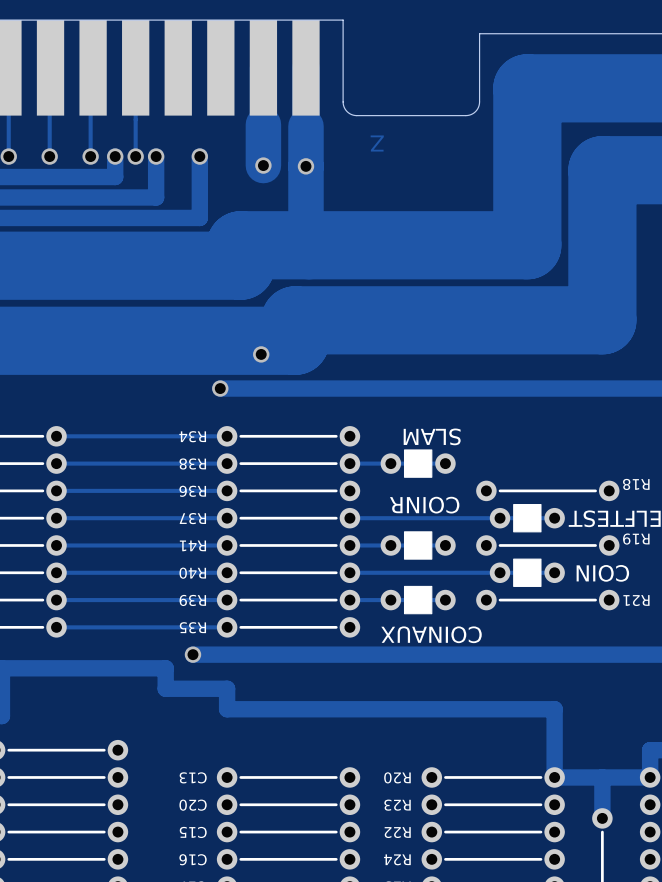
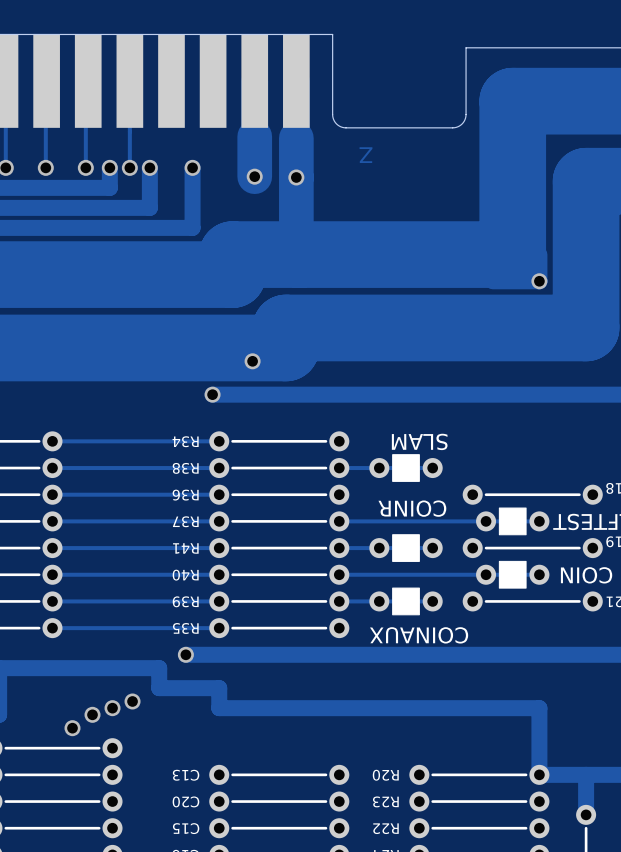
track: none -> (539, 254) (539, 281)
track: none -> (492, 281) (539, 281)
via: none -> (539, 281)
via: none -> (132, 701)
via: none -> (112, 708)
via: none -> (92, 714)
via: none -> (72, 728)

